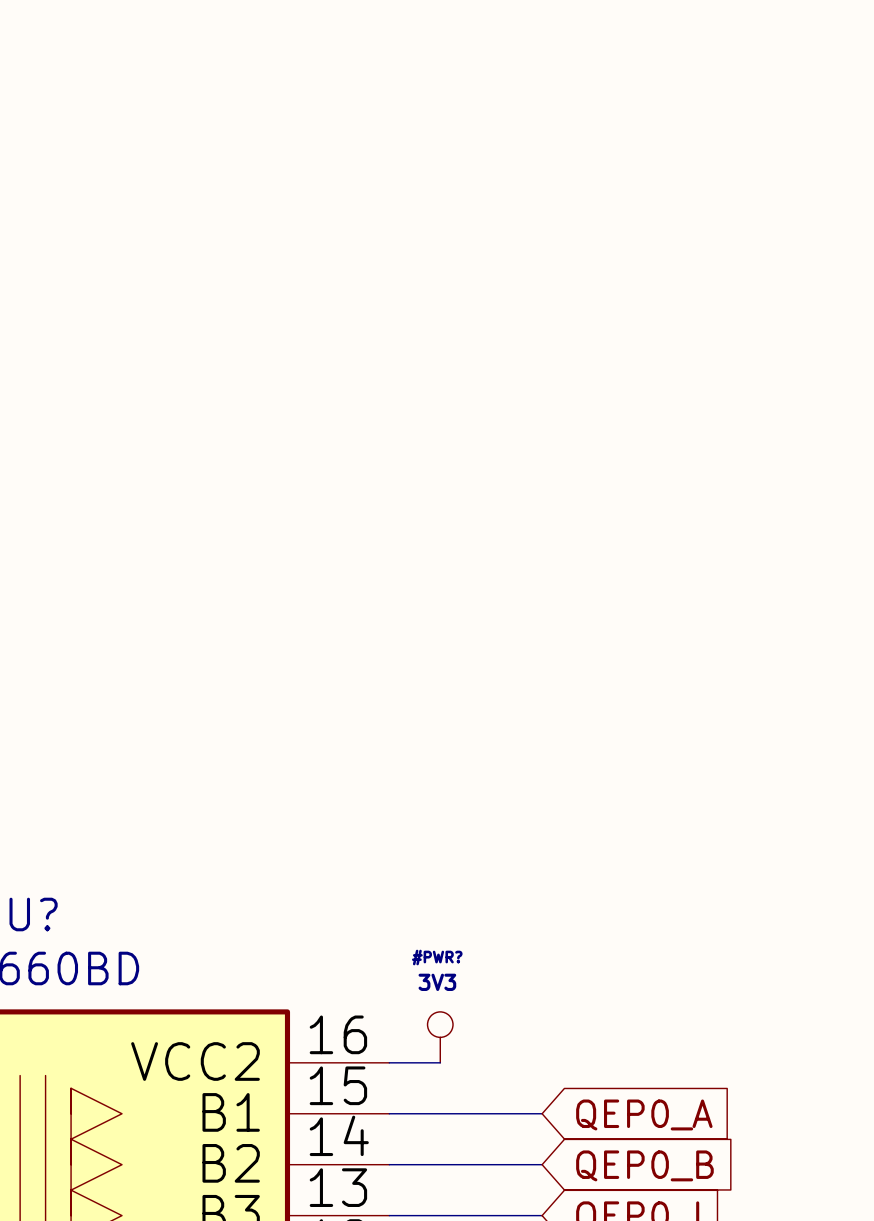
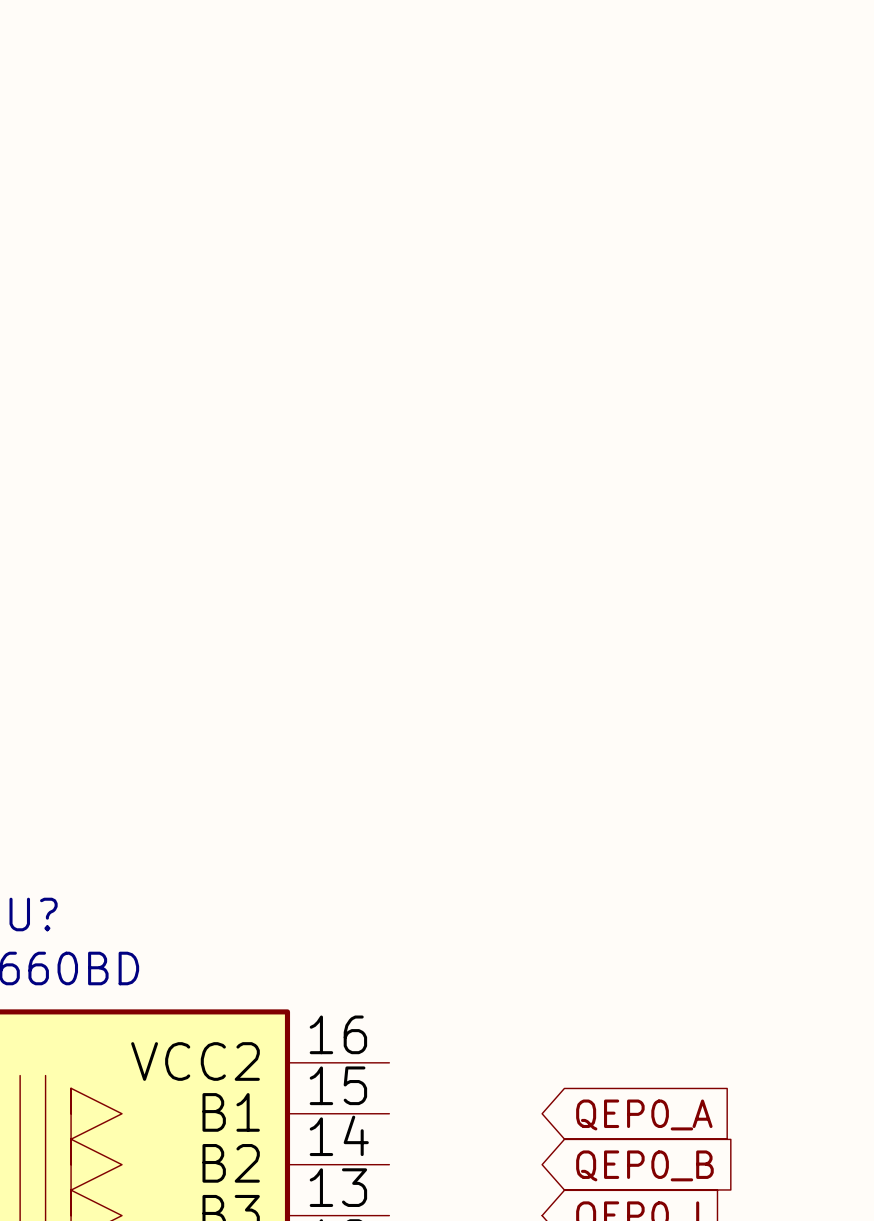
#PWR?: 3V3 (440, 1037) -> none
wire: (389, 1062) (440, 1062) -> none
wire: (389, 1113) (542, 1113) -> none
wire: (389, 1164) (542, 1164) -> none
wire: (389, 1215) (542, 1215) -> none

